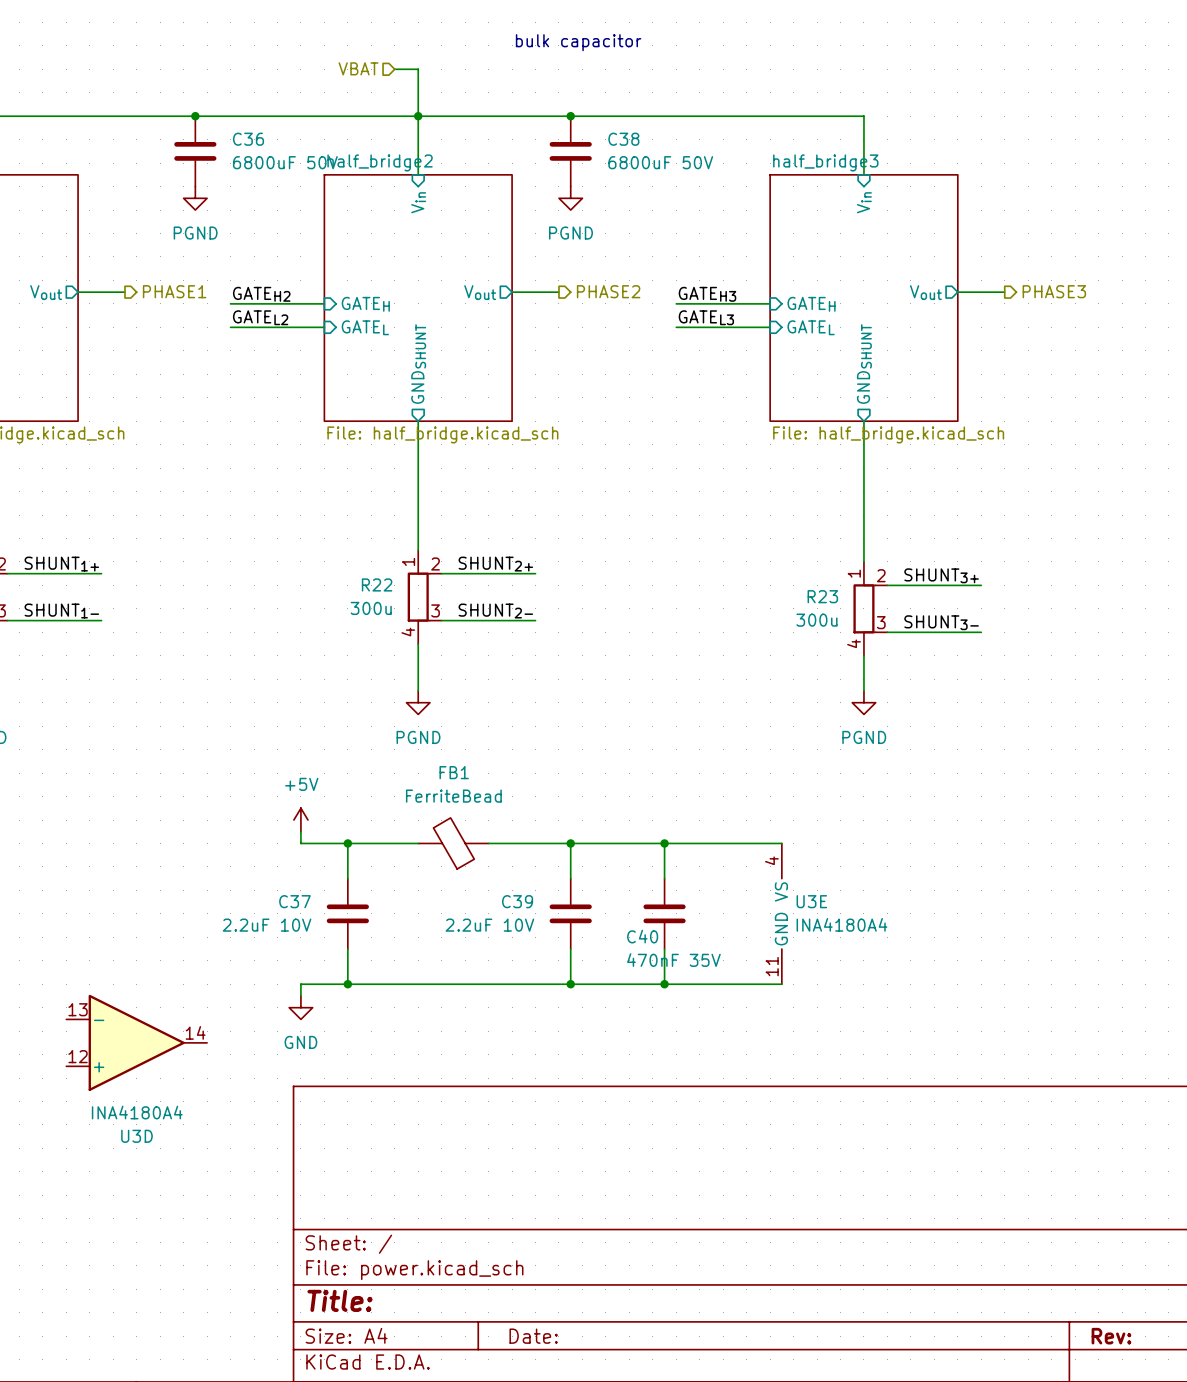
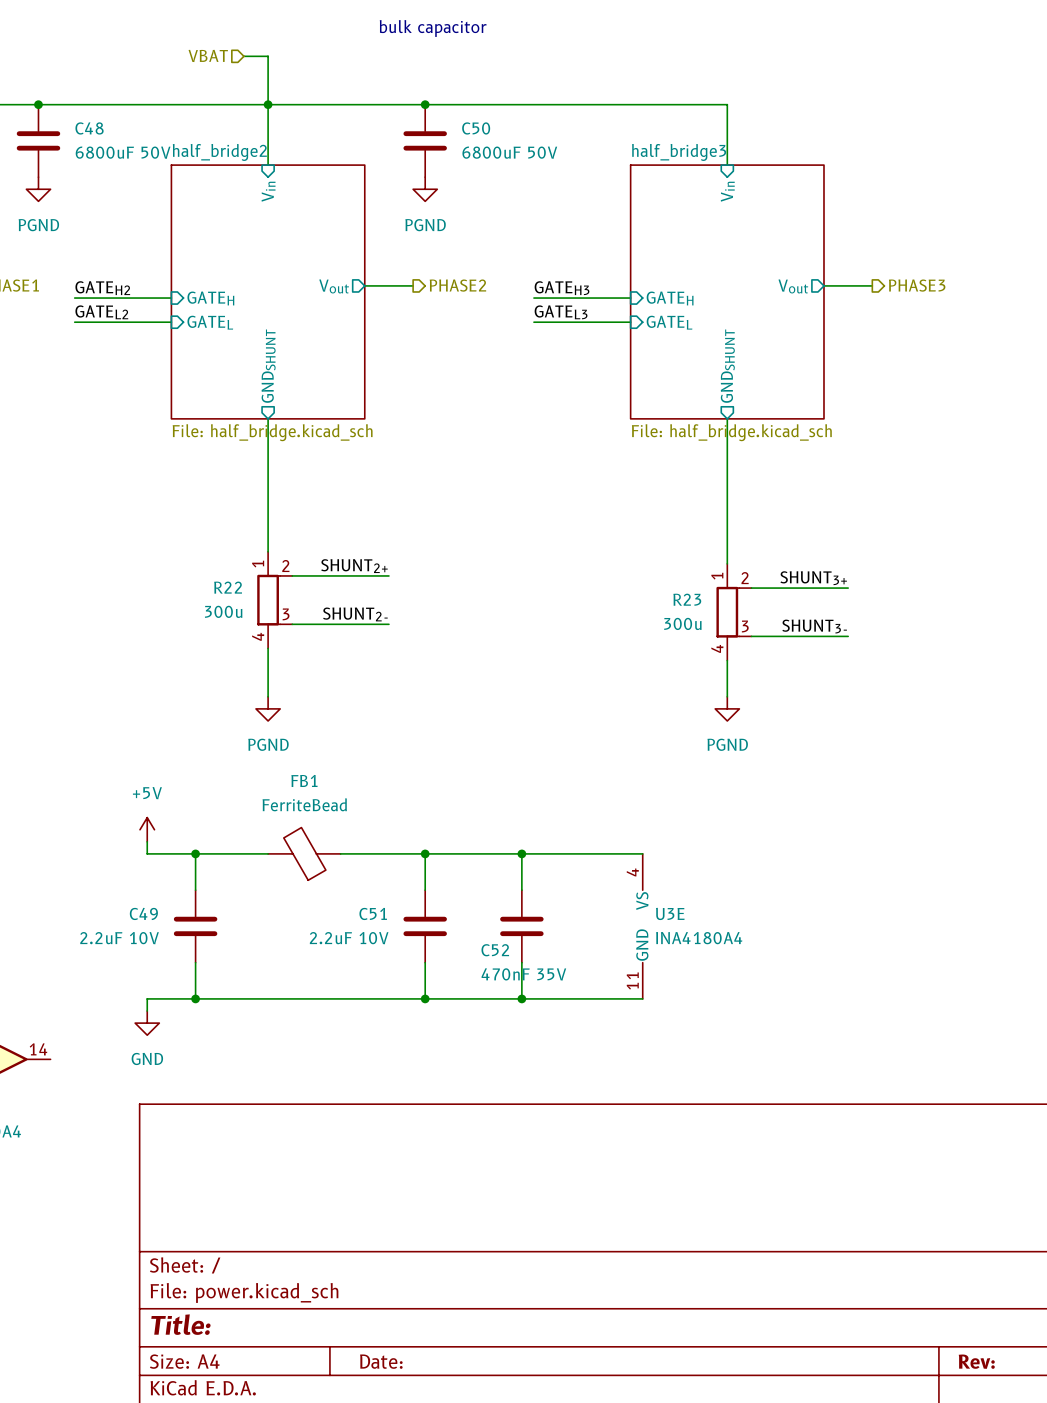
C36 name: C36 (248, 139) -> C48 (89, 128)
C38 name: C38 (623, 139) -> C50 (476, 128)
C37 name: C37 (294, 901) -> C49 (143, 913)
C39 name: C39 (517, 901) -> C51 (373, 913)
C40 name: C40 (642, 936) -> C52 (495, 950)

